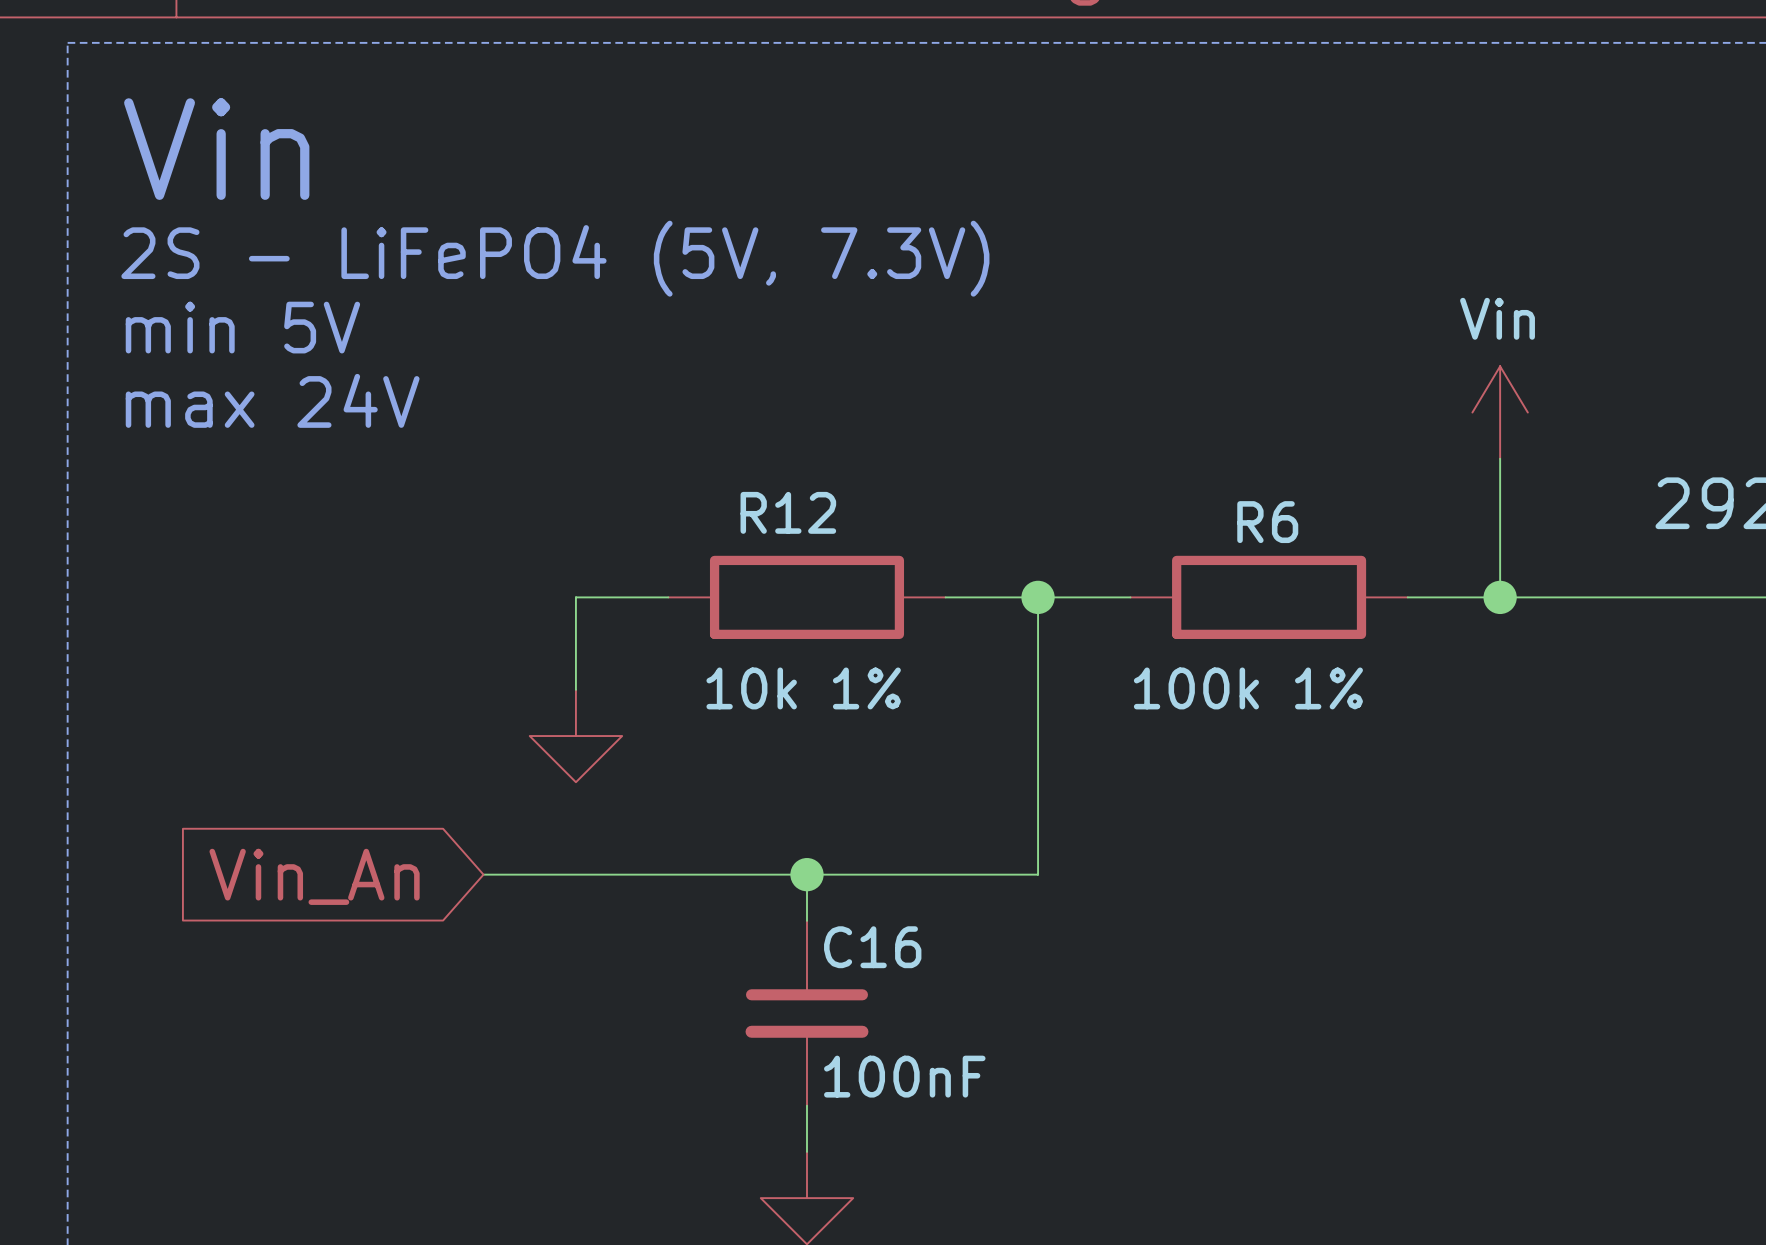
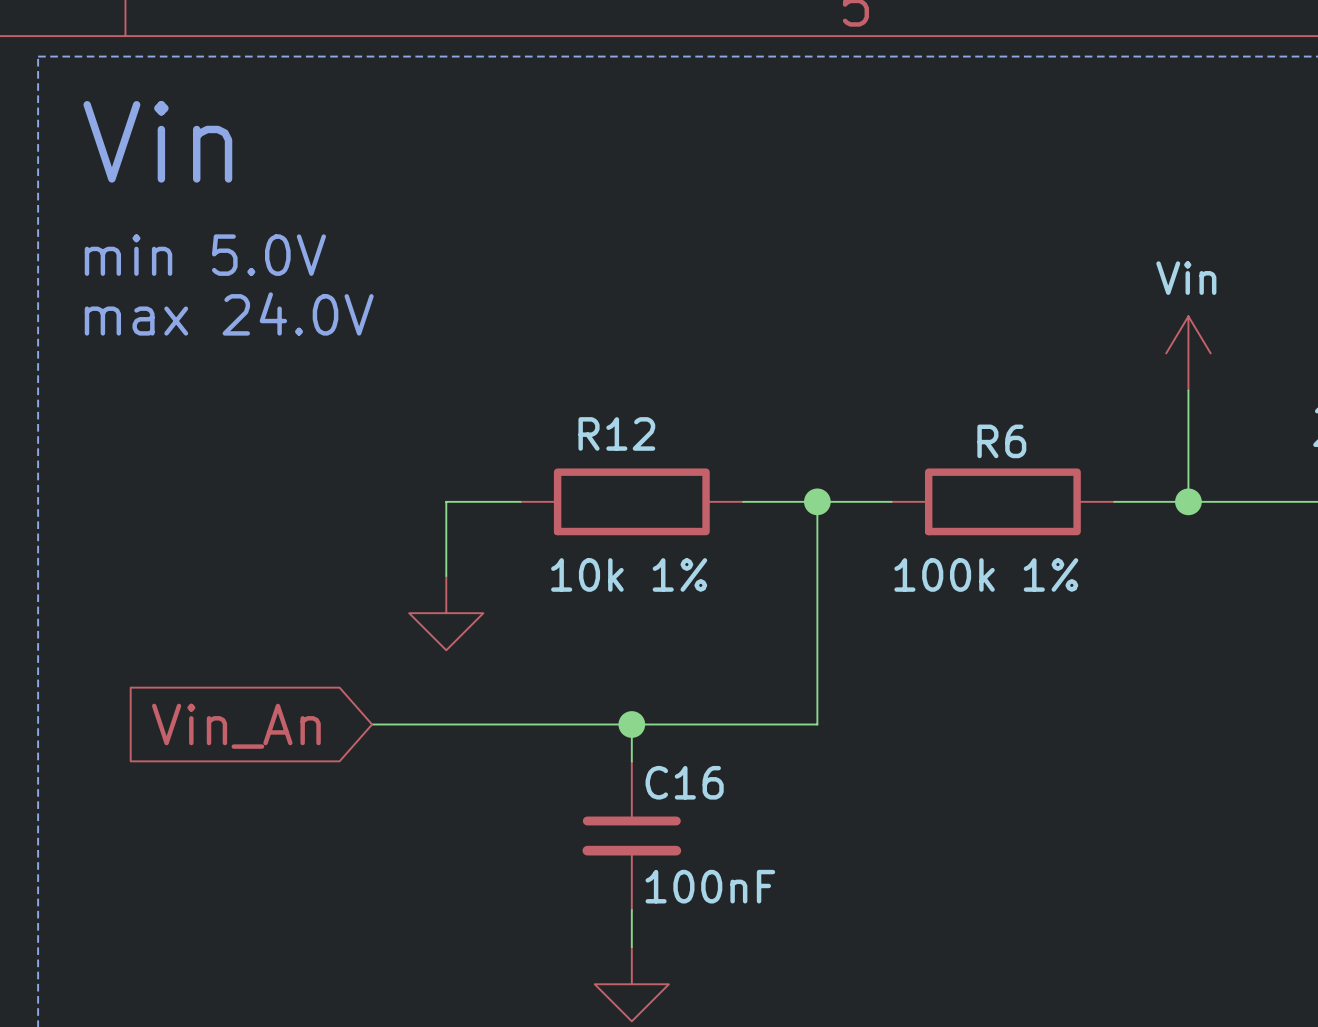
text: 2S - LiFePO4 (5V, 7.3V) (555, 258) -> none
text: min 5V (242, 327) -> min 5.0V (205, 255)
text: max 24V (272, 400) -> max 24.0V (229, 313)

